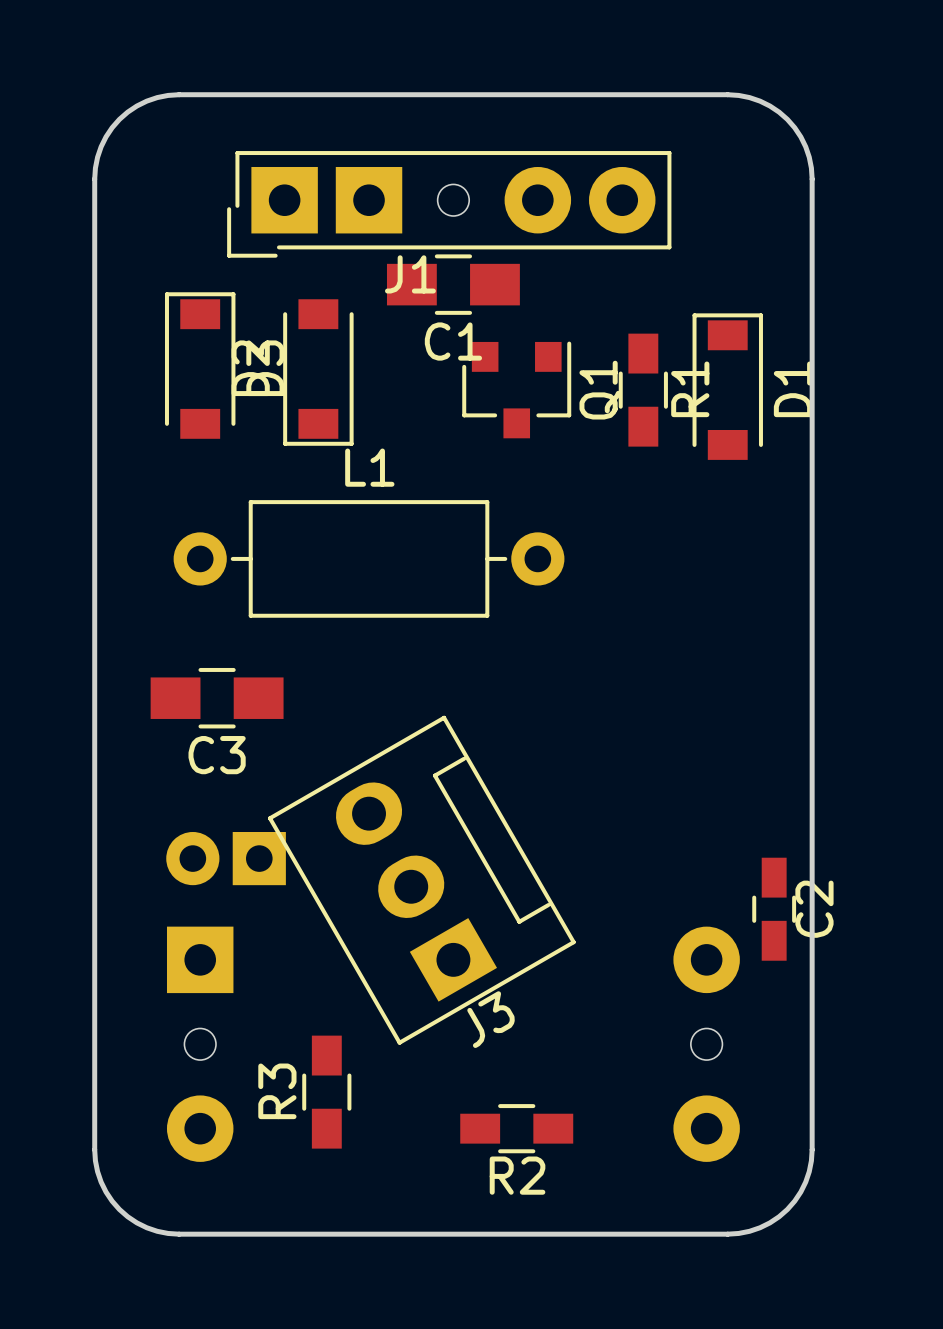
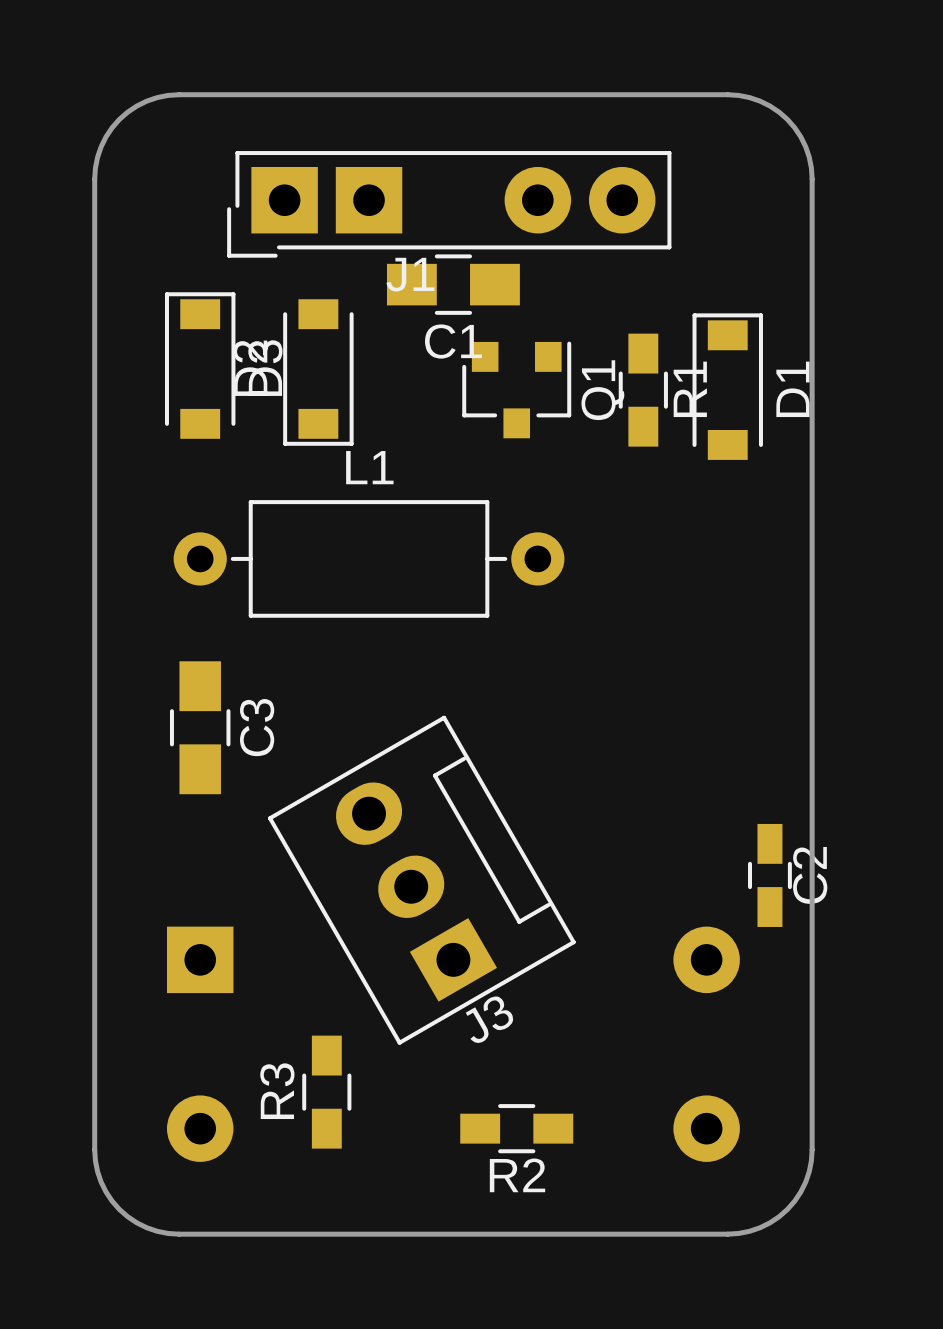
J1 footprint: [166, 151, 740, 1162] -> [166, 151, 740, 1162]
C3 rotation: 0° (217, 698) -> 90° clockwise (200, 727)
C3 name position: C3 (217, 755) -> C3 (257, 727)
part: (226, 858) -> none
C2 position: (774, 909) -> (769, 875)

